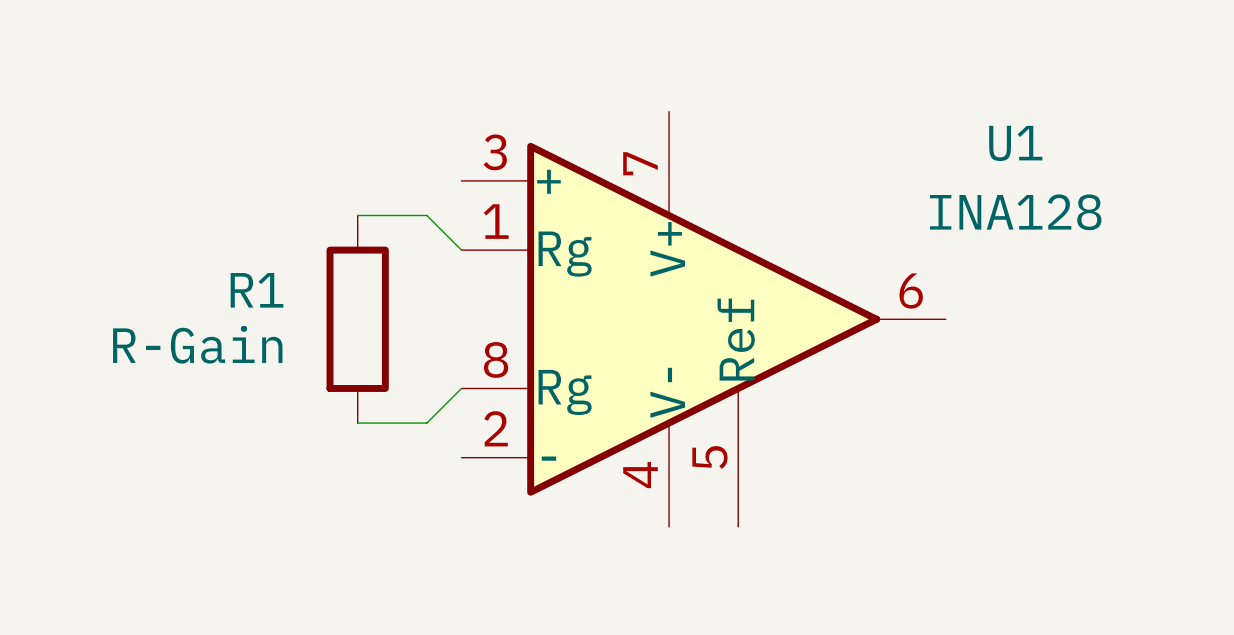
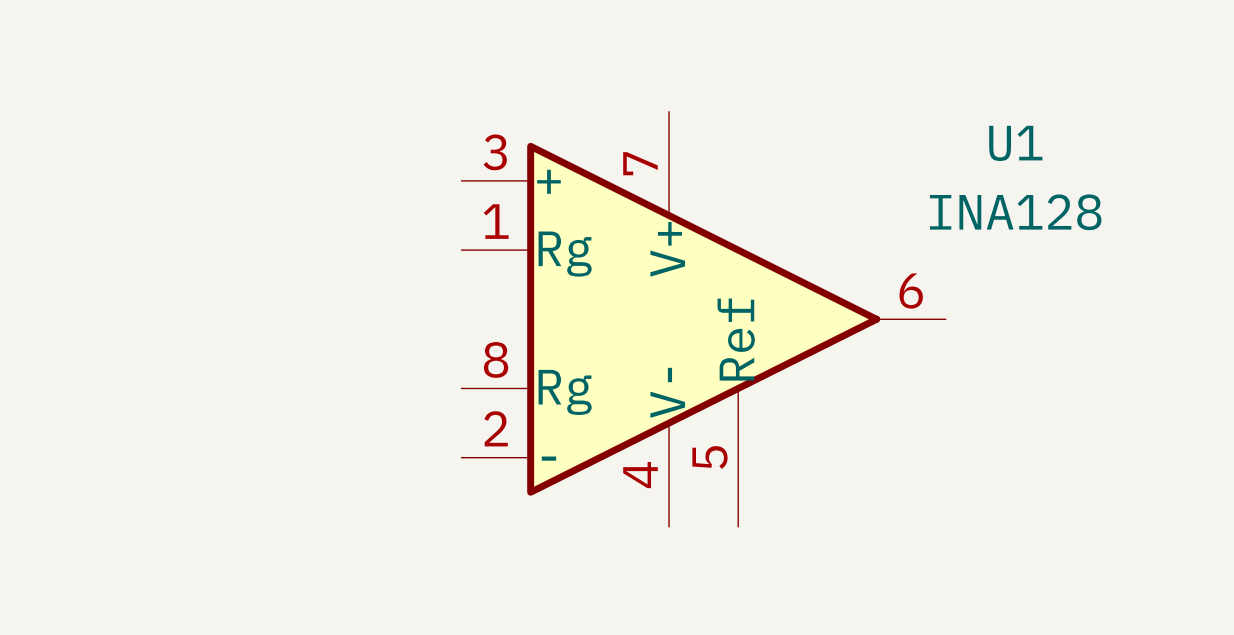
wire: (357, 215) (426, 215) (461, 250) -> none
R1: R-Gain (357, 319) -> none
wire: (461, 388) (426, 423) (357, 423) -> none

